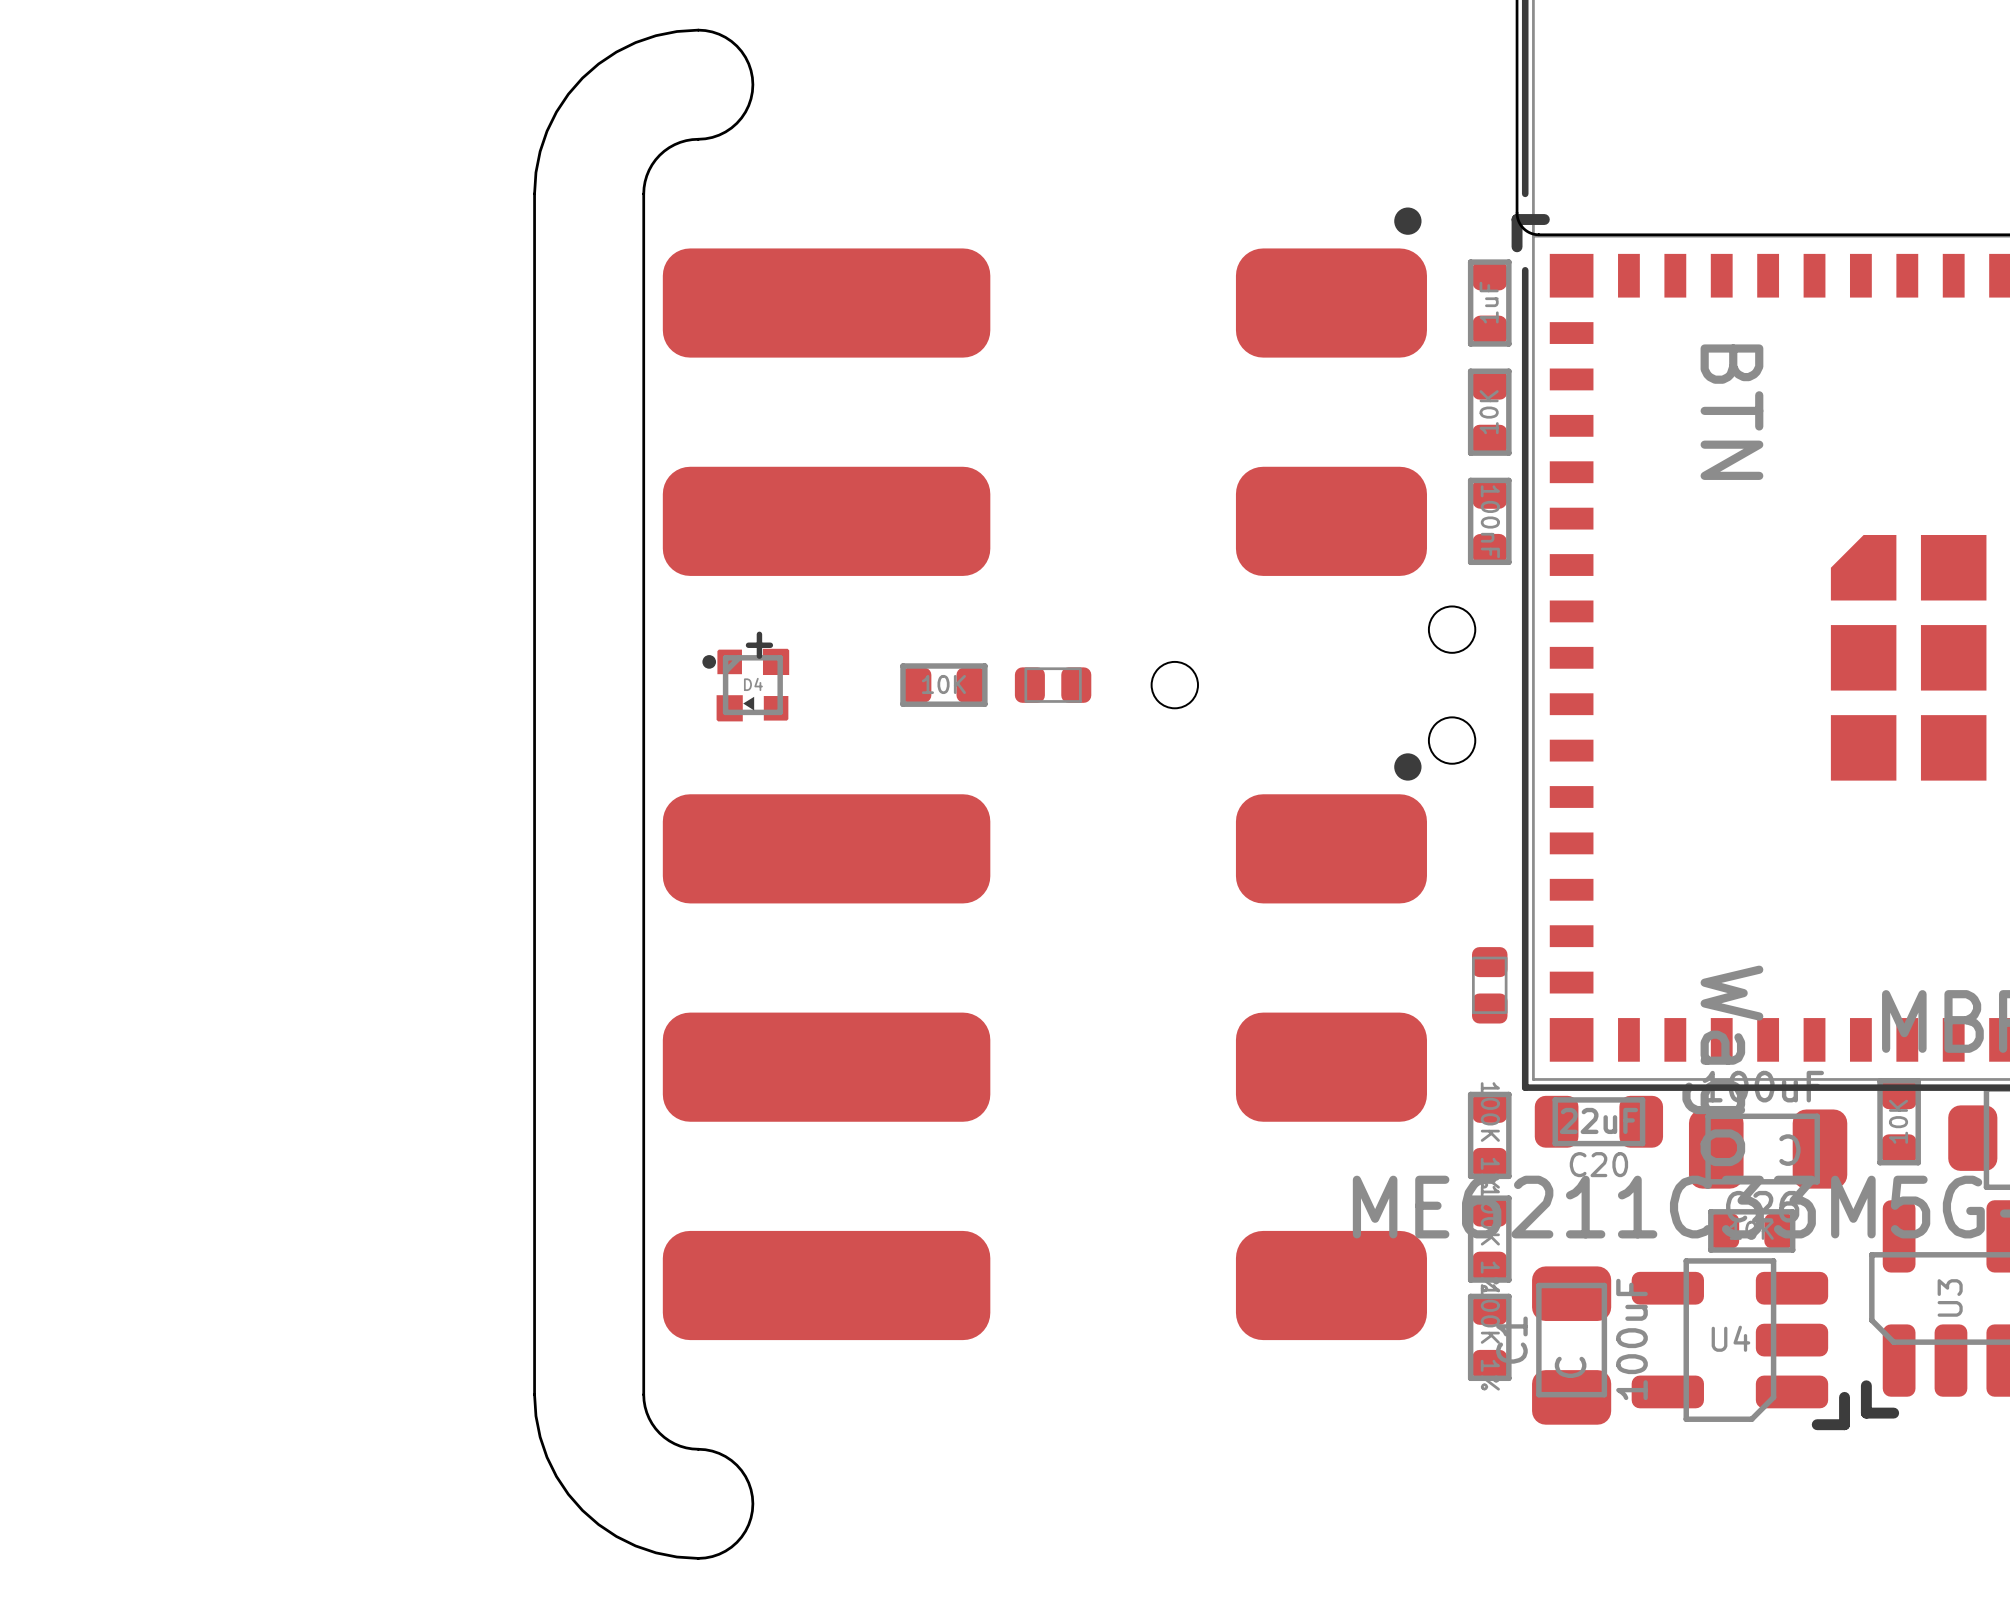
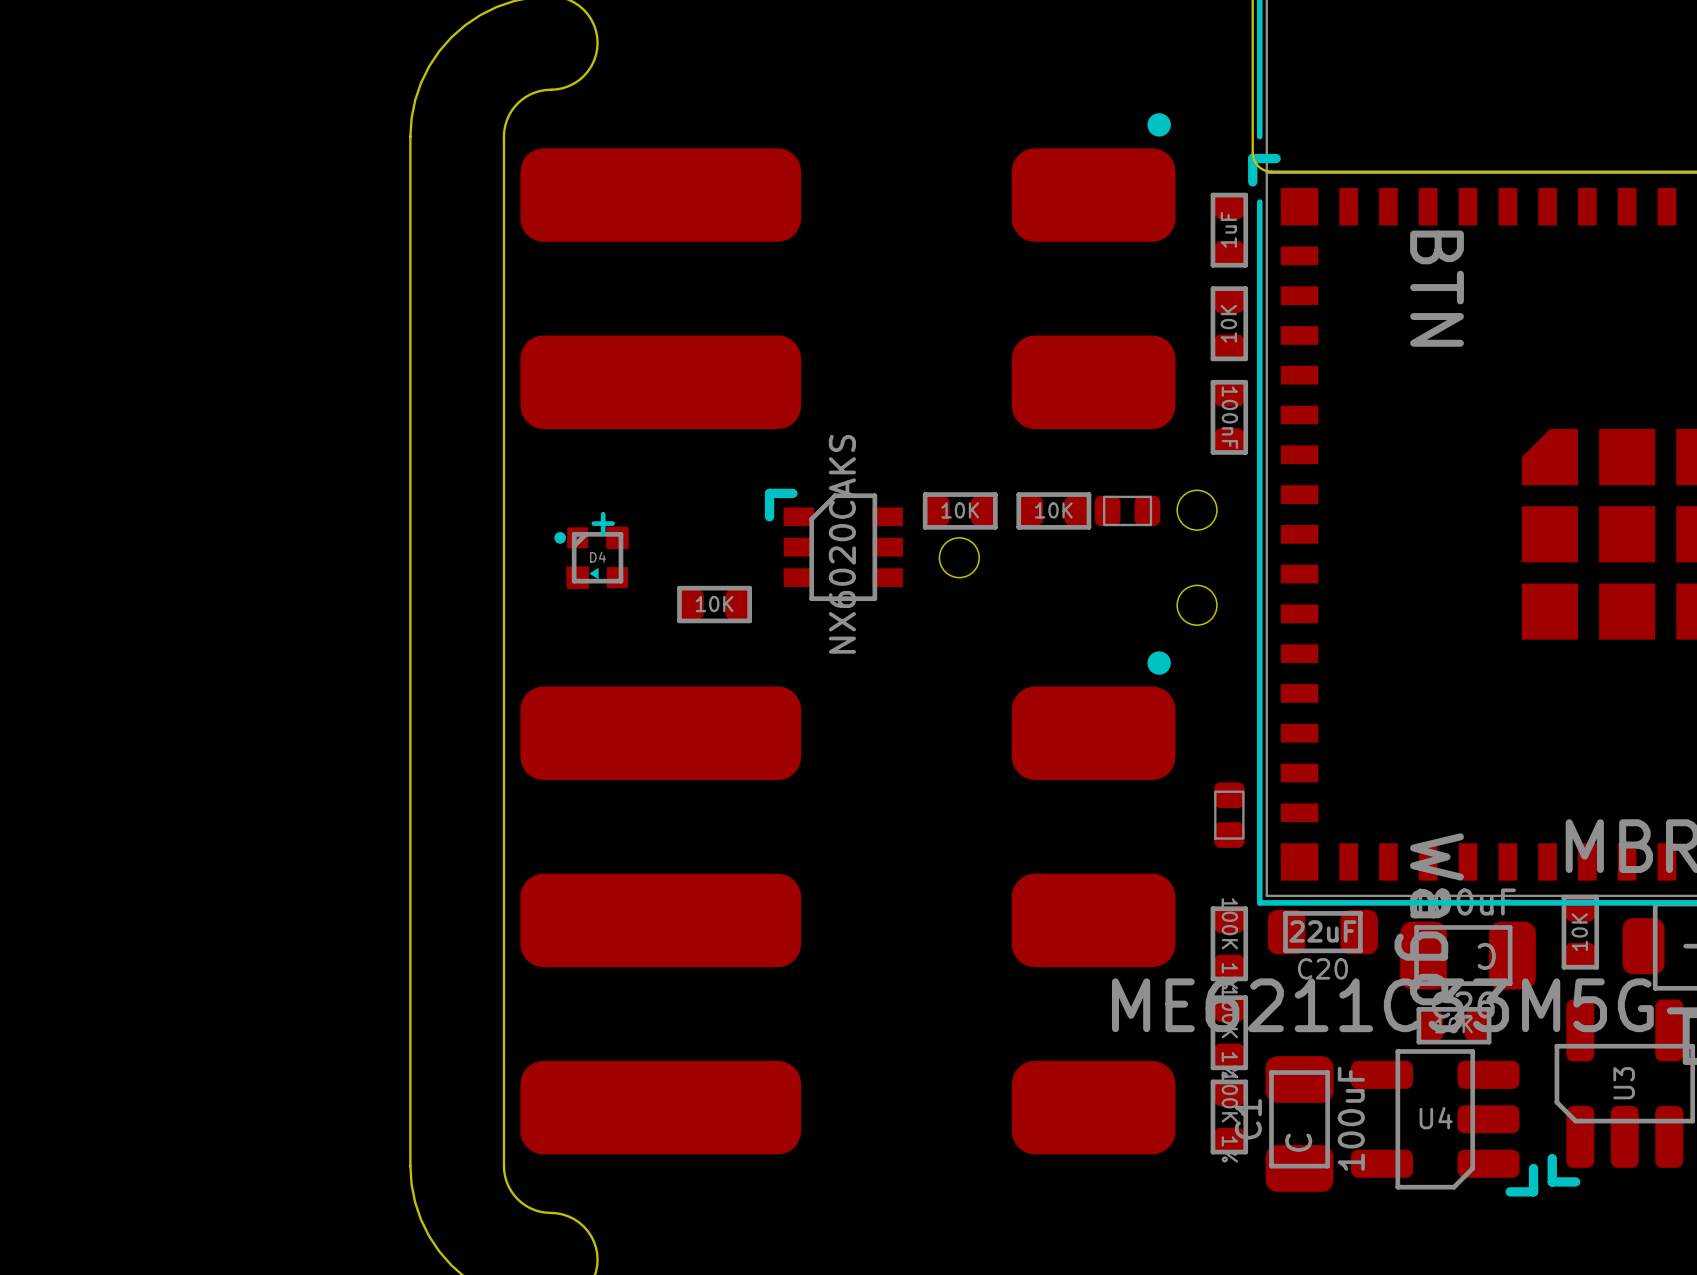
part position: (1044, 391) -> (847, 271)
part: none -> 10K (960, 510)
part: none -> 10K (1053, 510)
part: none -> (1127, 510)
part footprint: [1014, 667, 1092, 703] -> [764, 488, 903, 602]
part value: none -> NX6020CAKS (842, 544)
part position: (943, 685) -> (714, 604)
part position: (1044, 1046) -> (847, 902)

